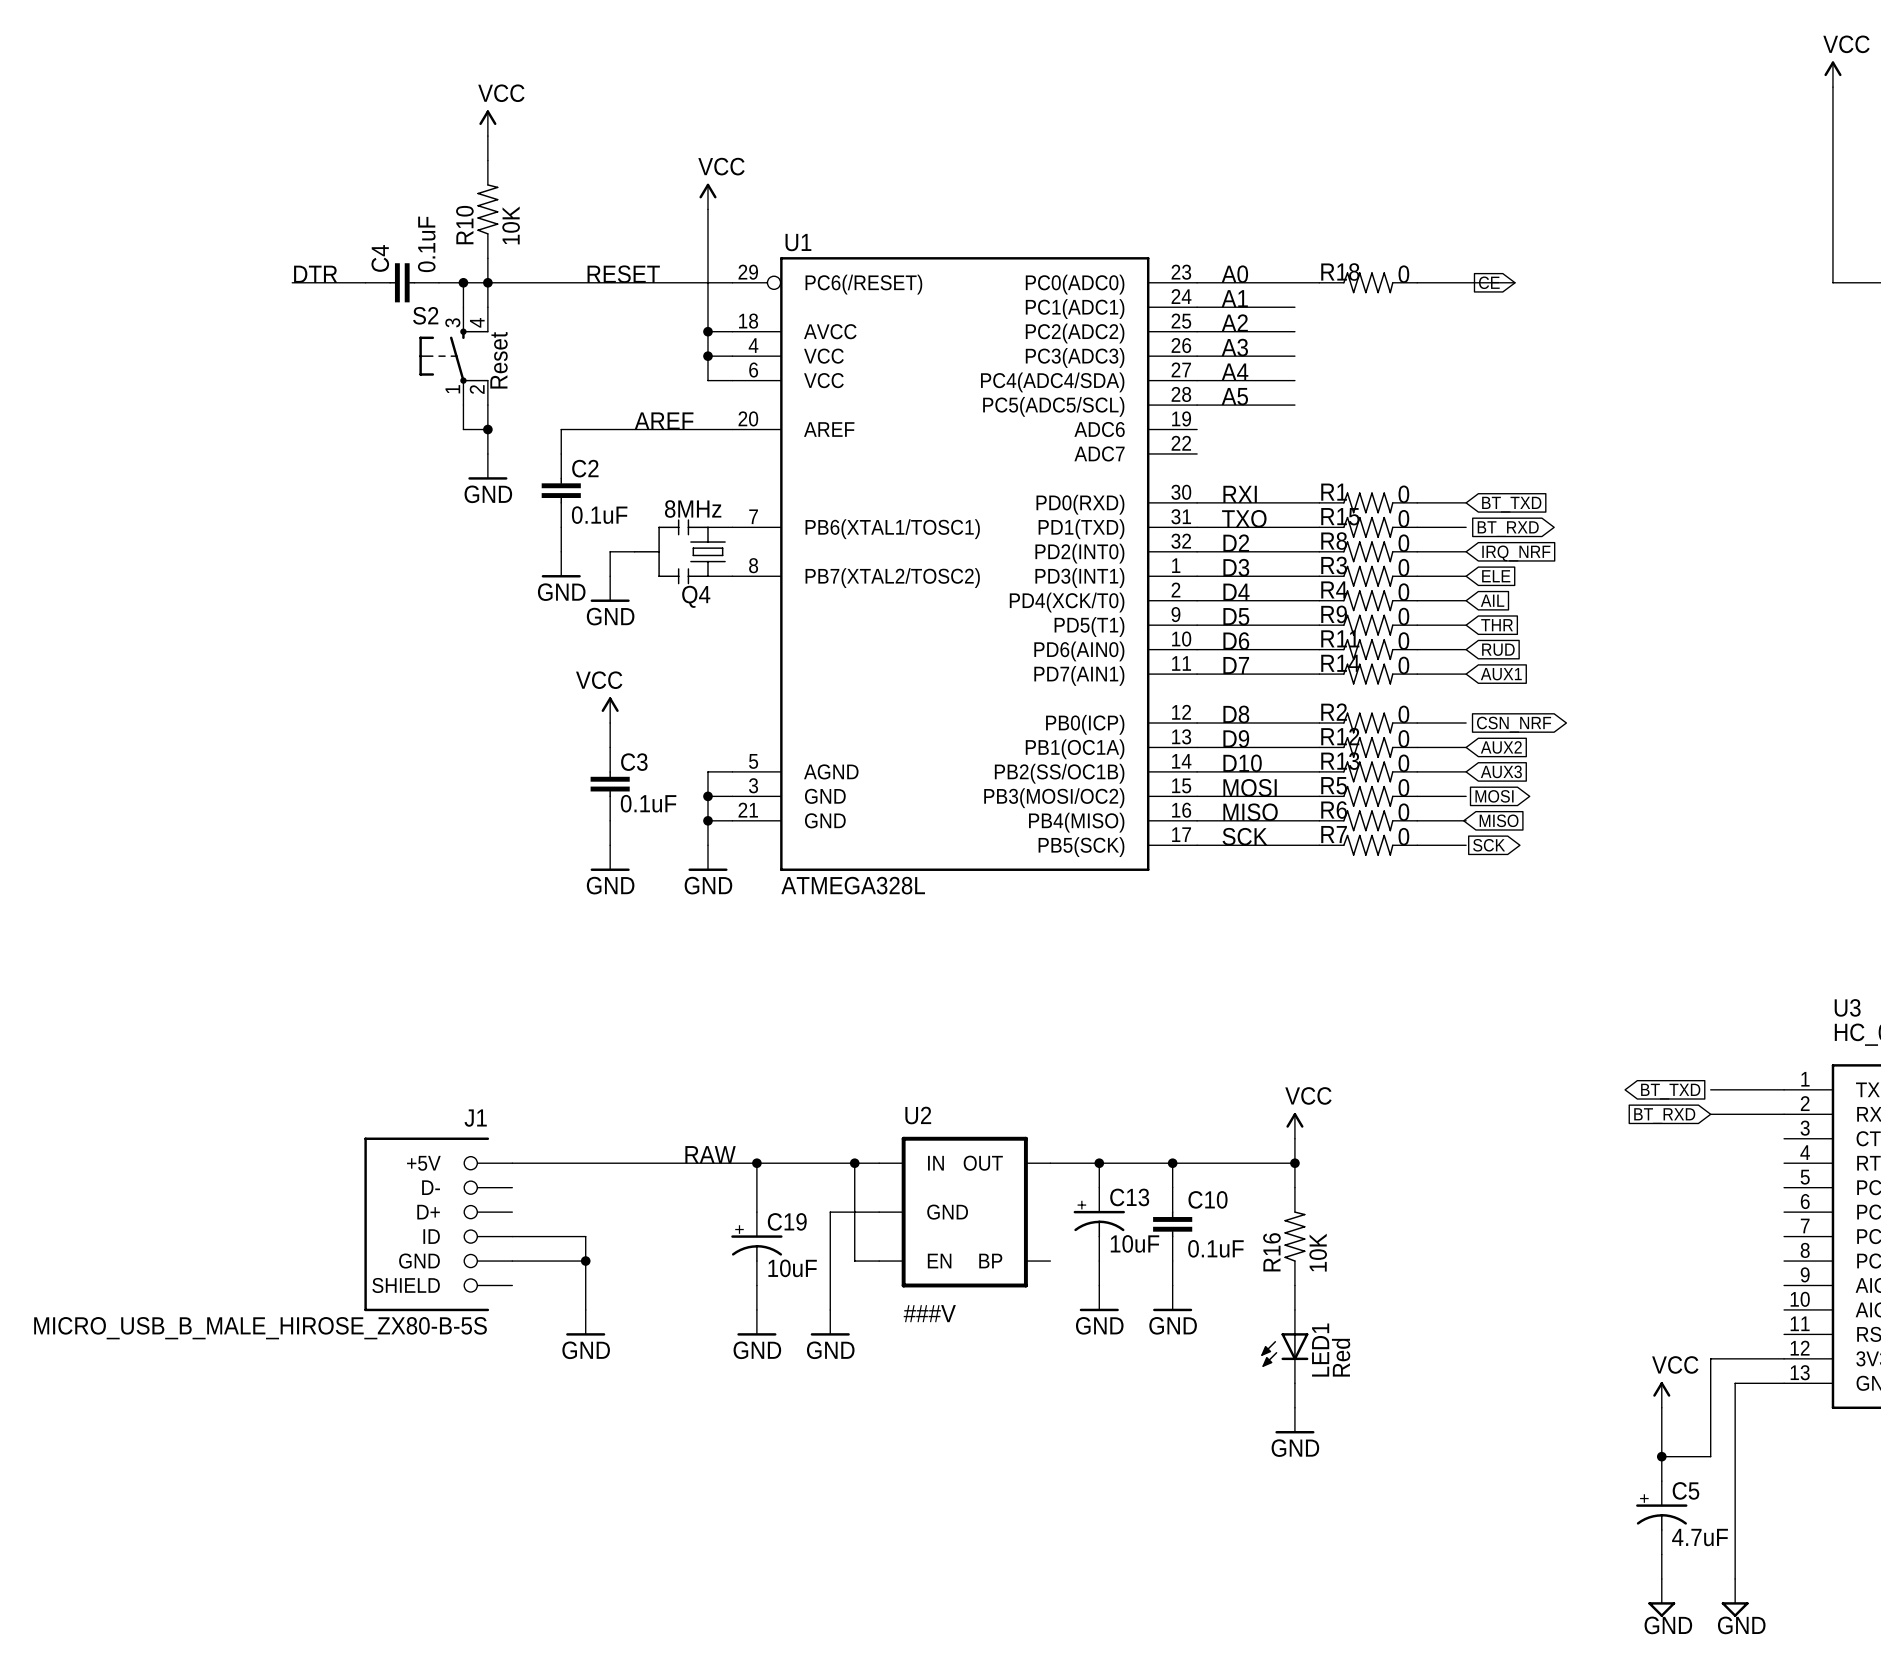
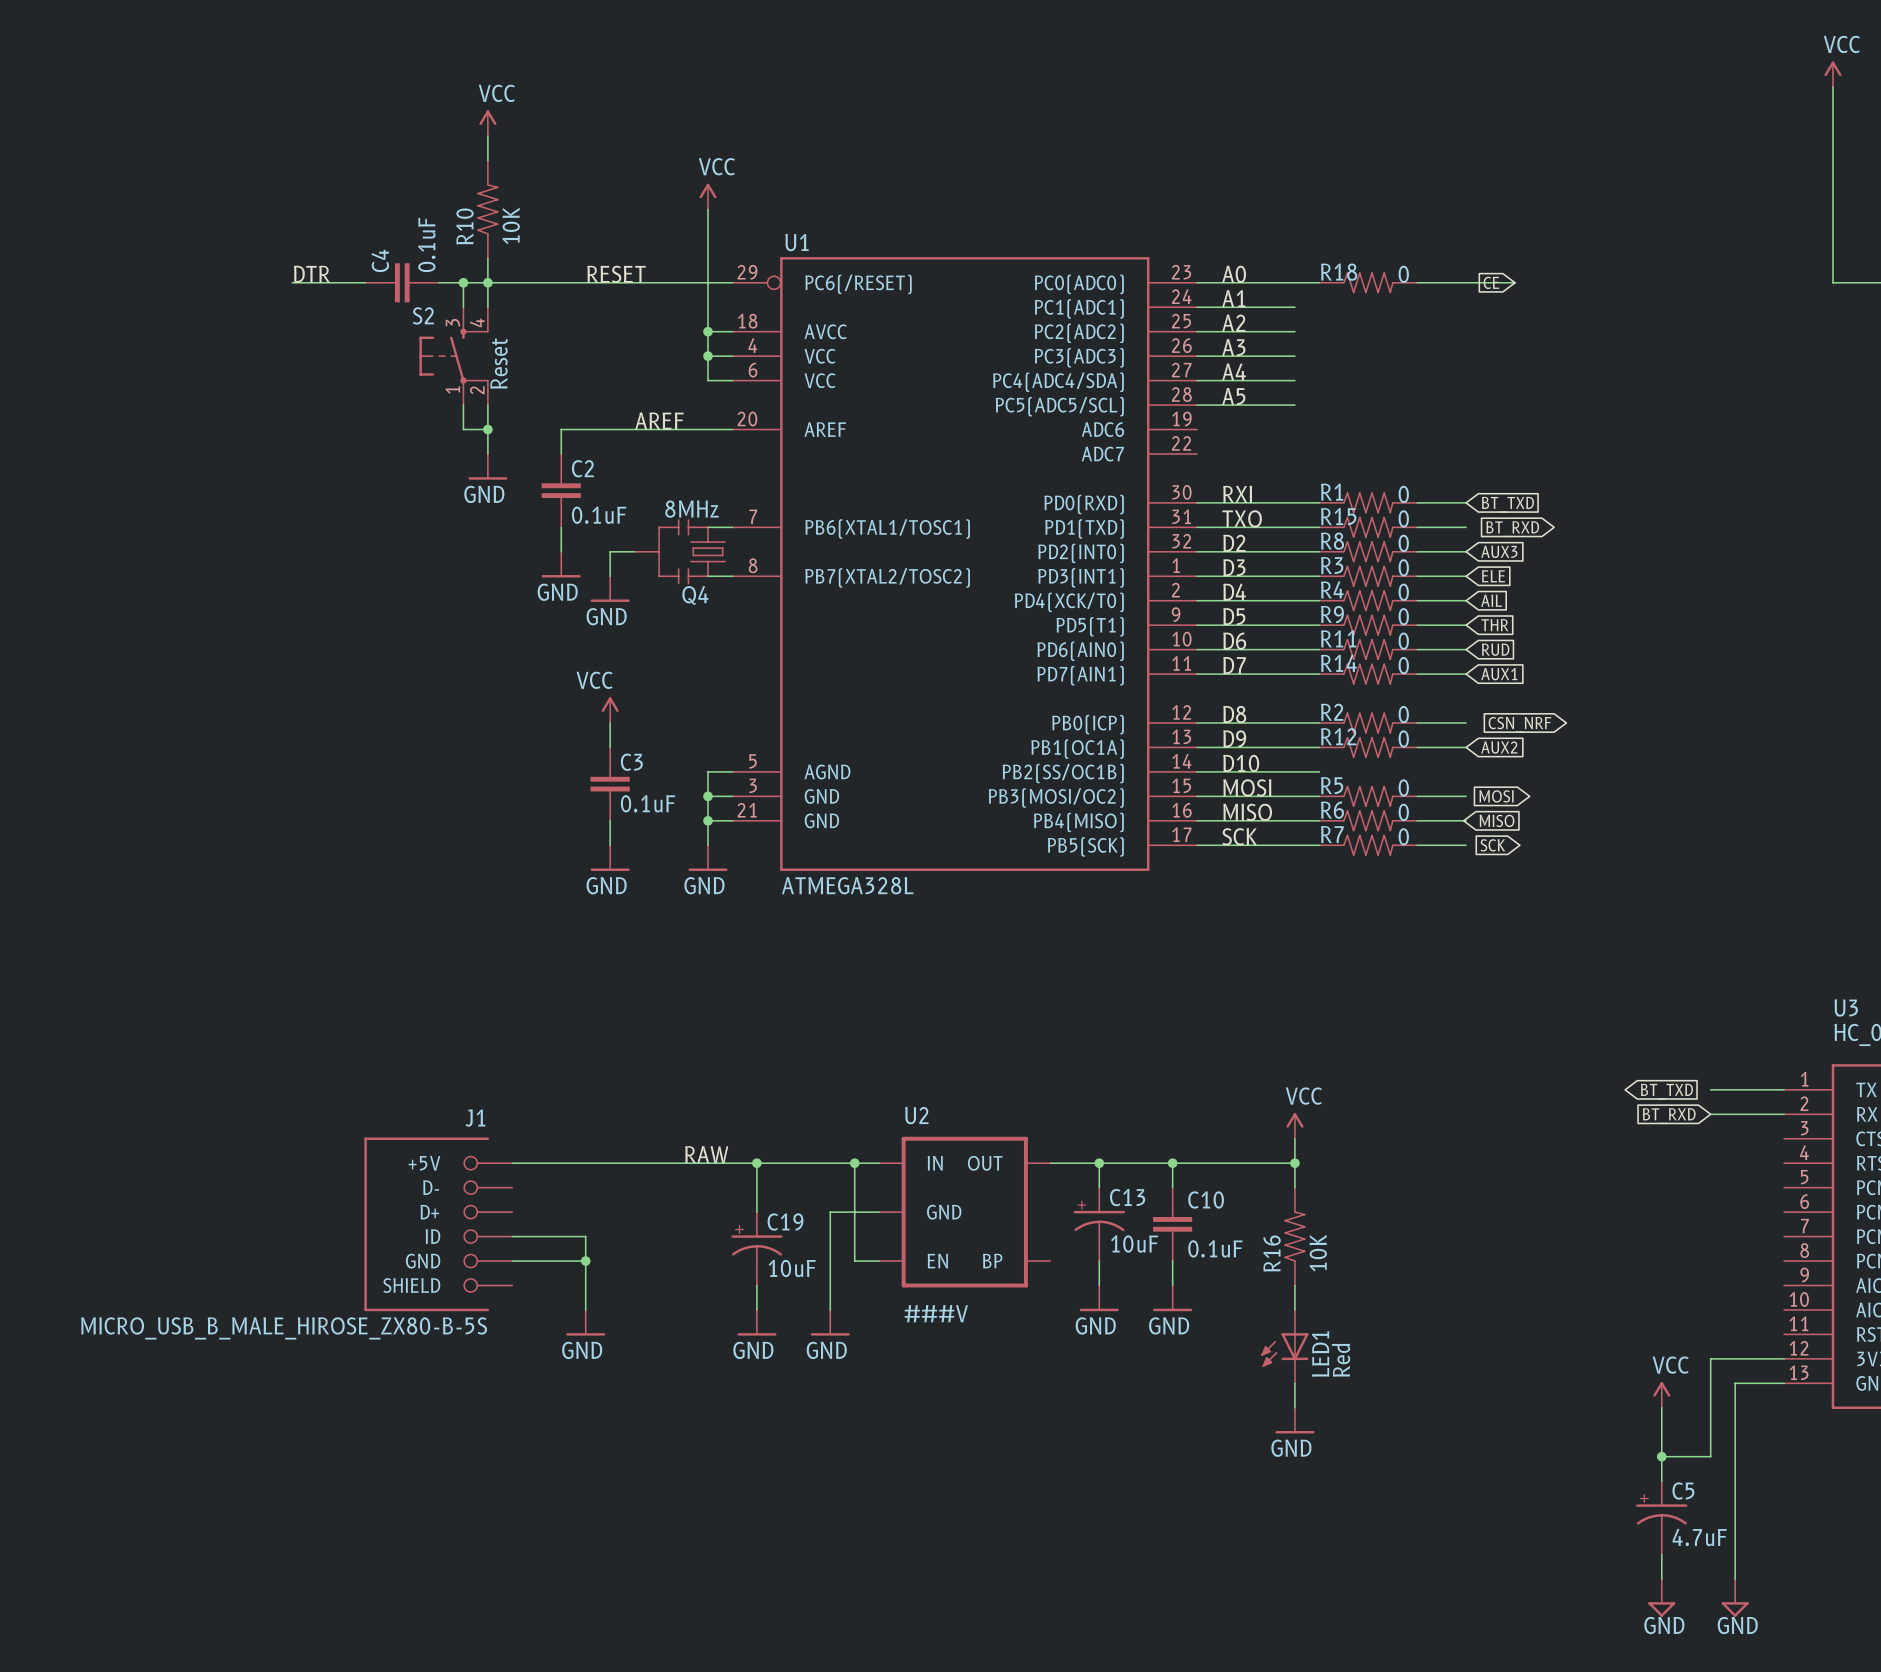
global label: IRQ_NRF (1516, 553) -> AUX3 (1499, 551)
R13: 0 (1368, 771) -> none
wire: (1417, 771) (1466, 771) -> none
global label: AUX3 (1501, 771) -> none

